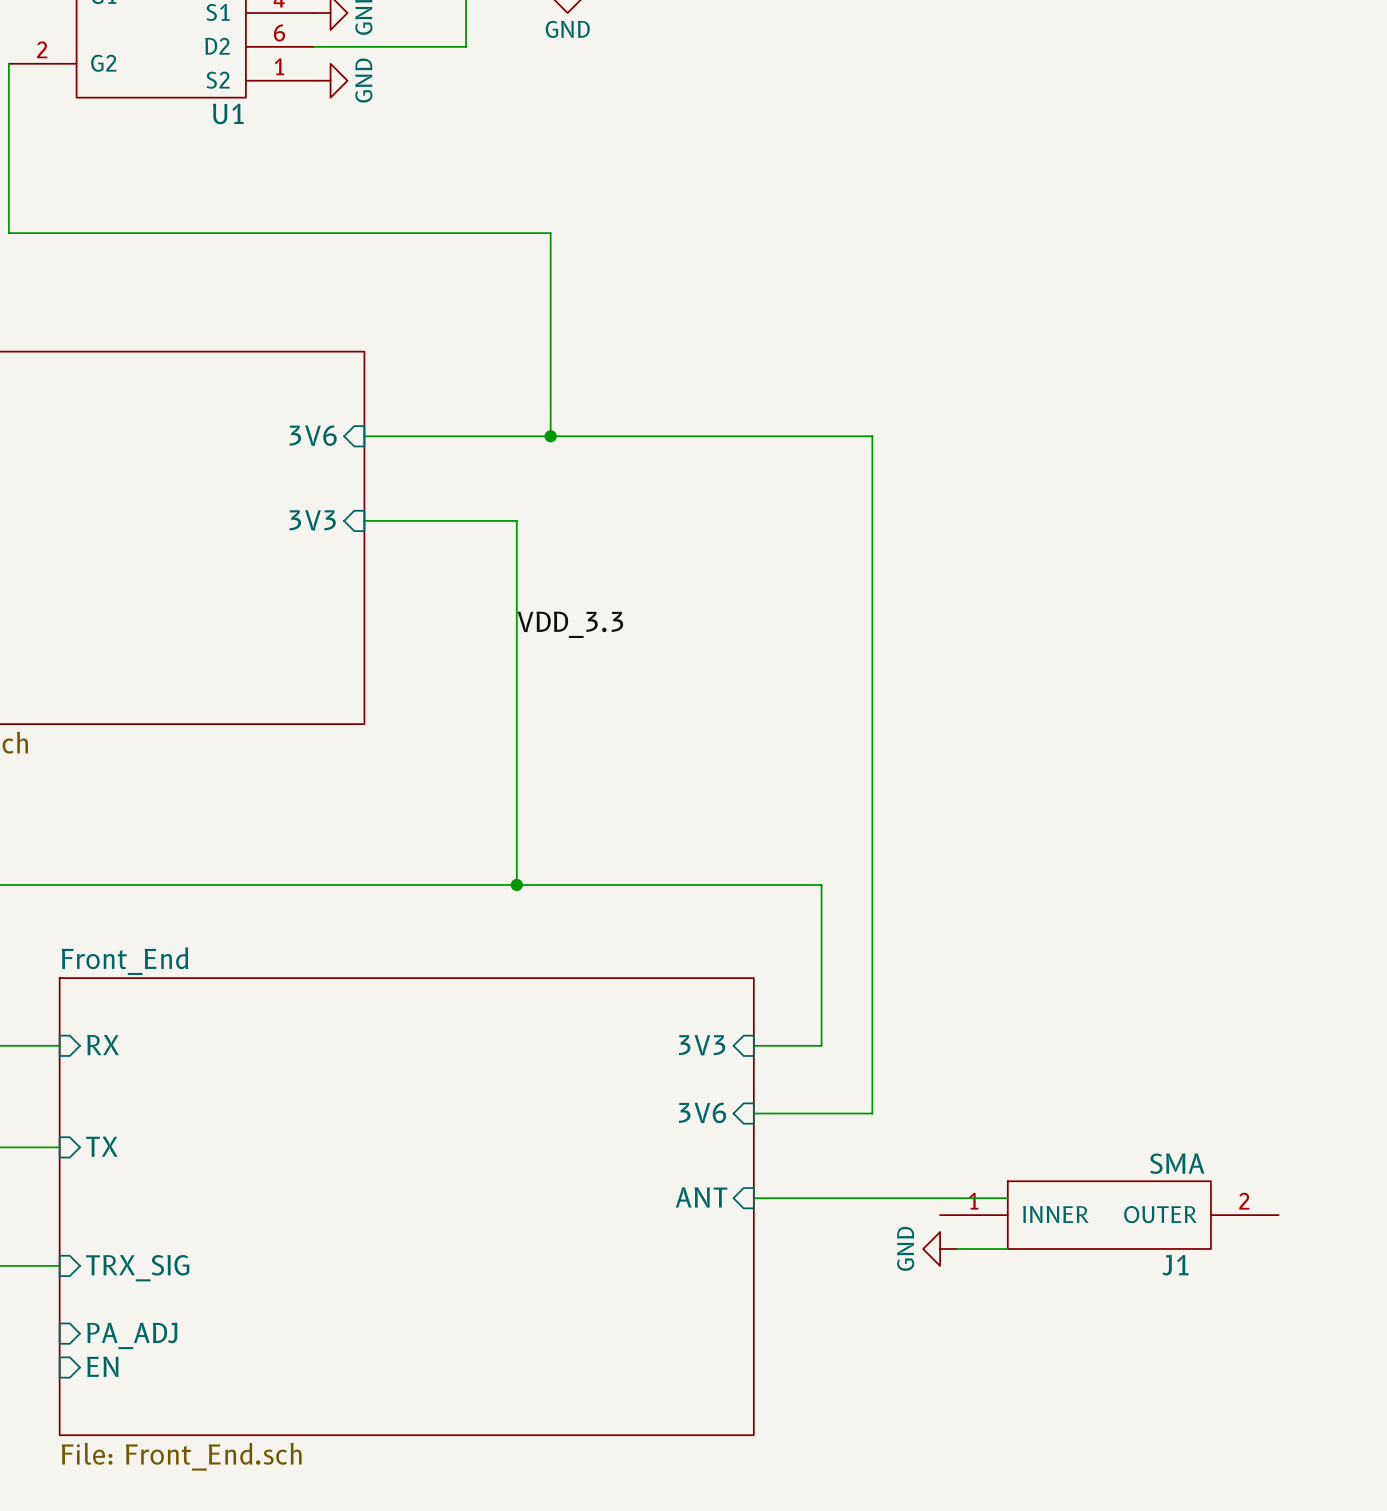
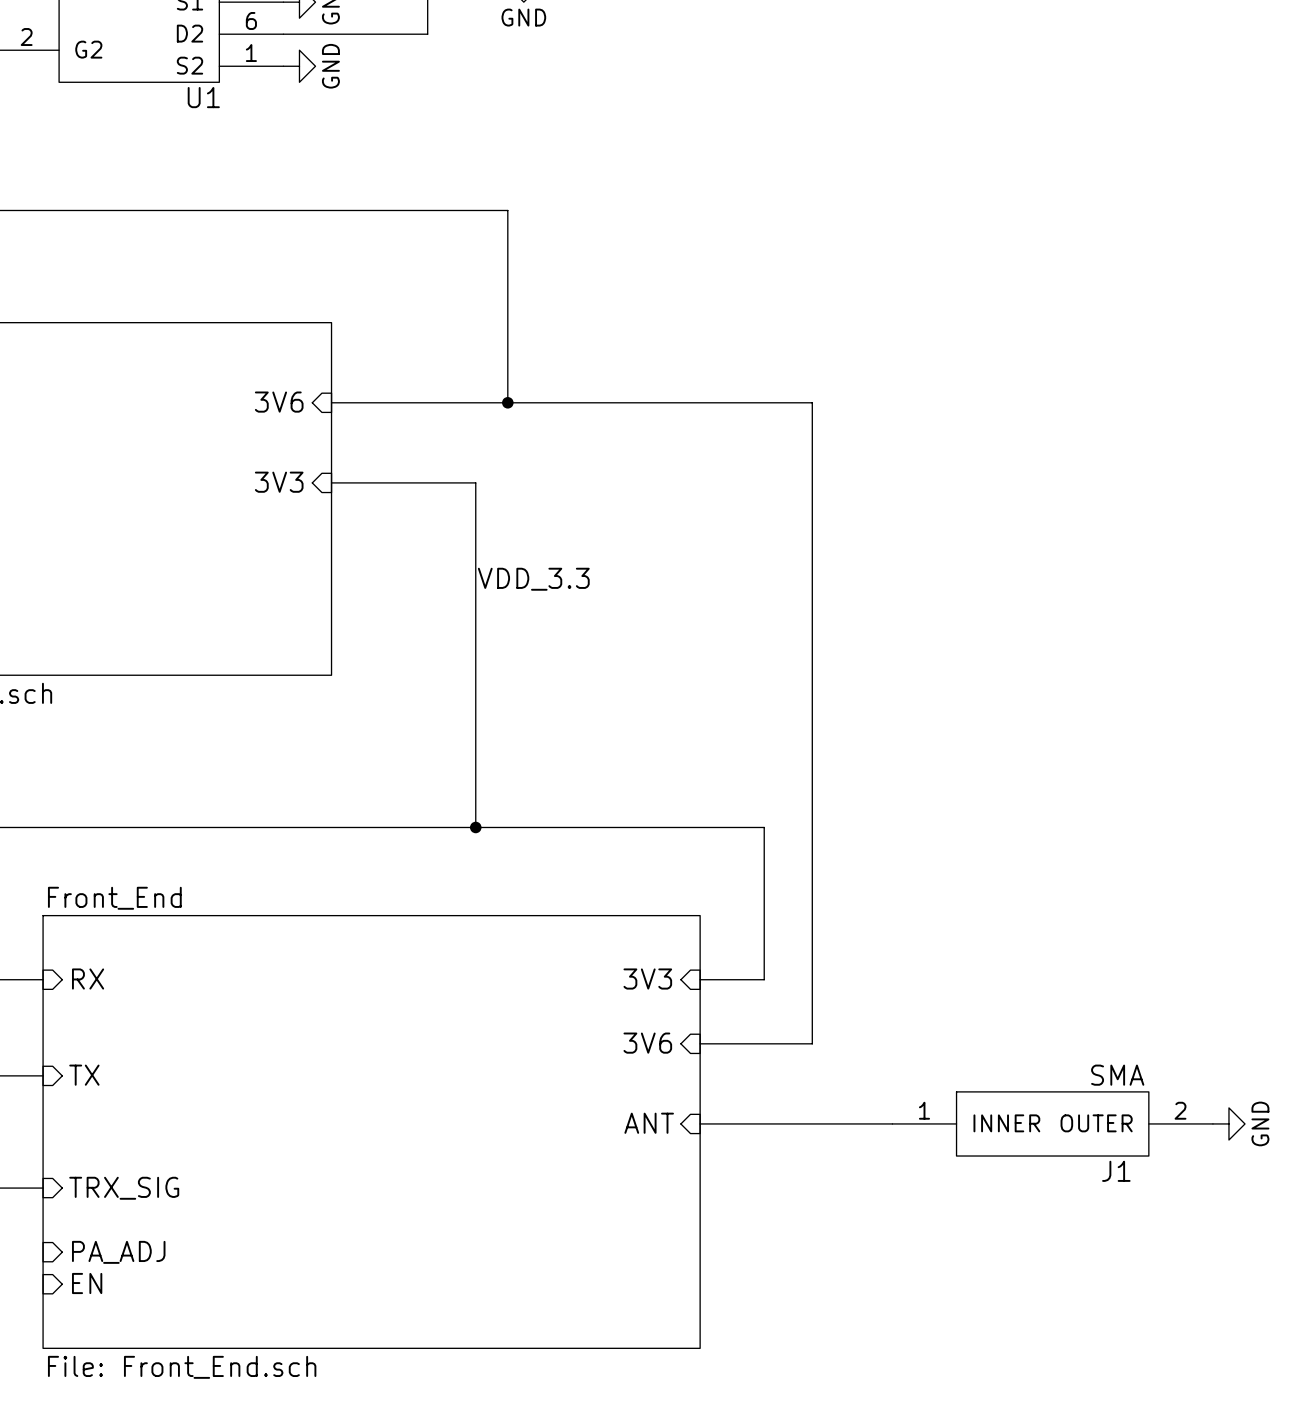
power symbol: none -> GND (1228, 1123)
J1 position: (1109, 1215) -> (1052, 1123)
power symbol: GND (940, 1248) -> none
wire: (957, 1248) (1007, 1248) -> none

